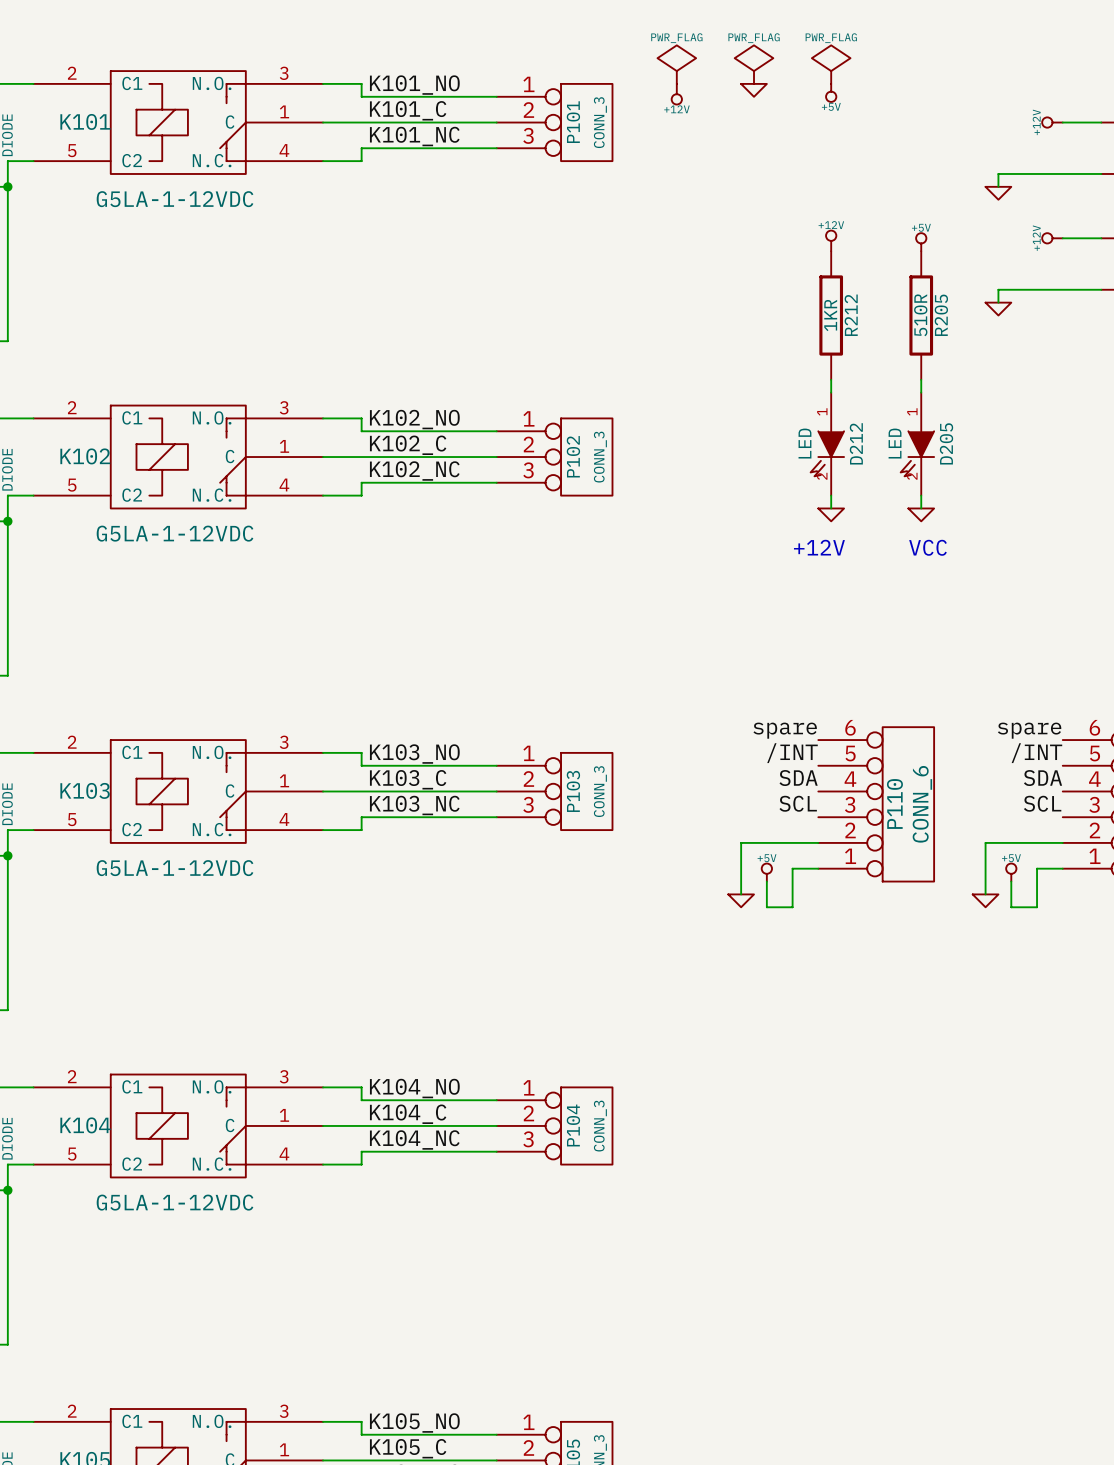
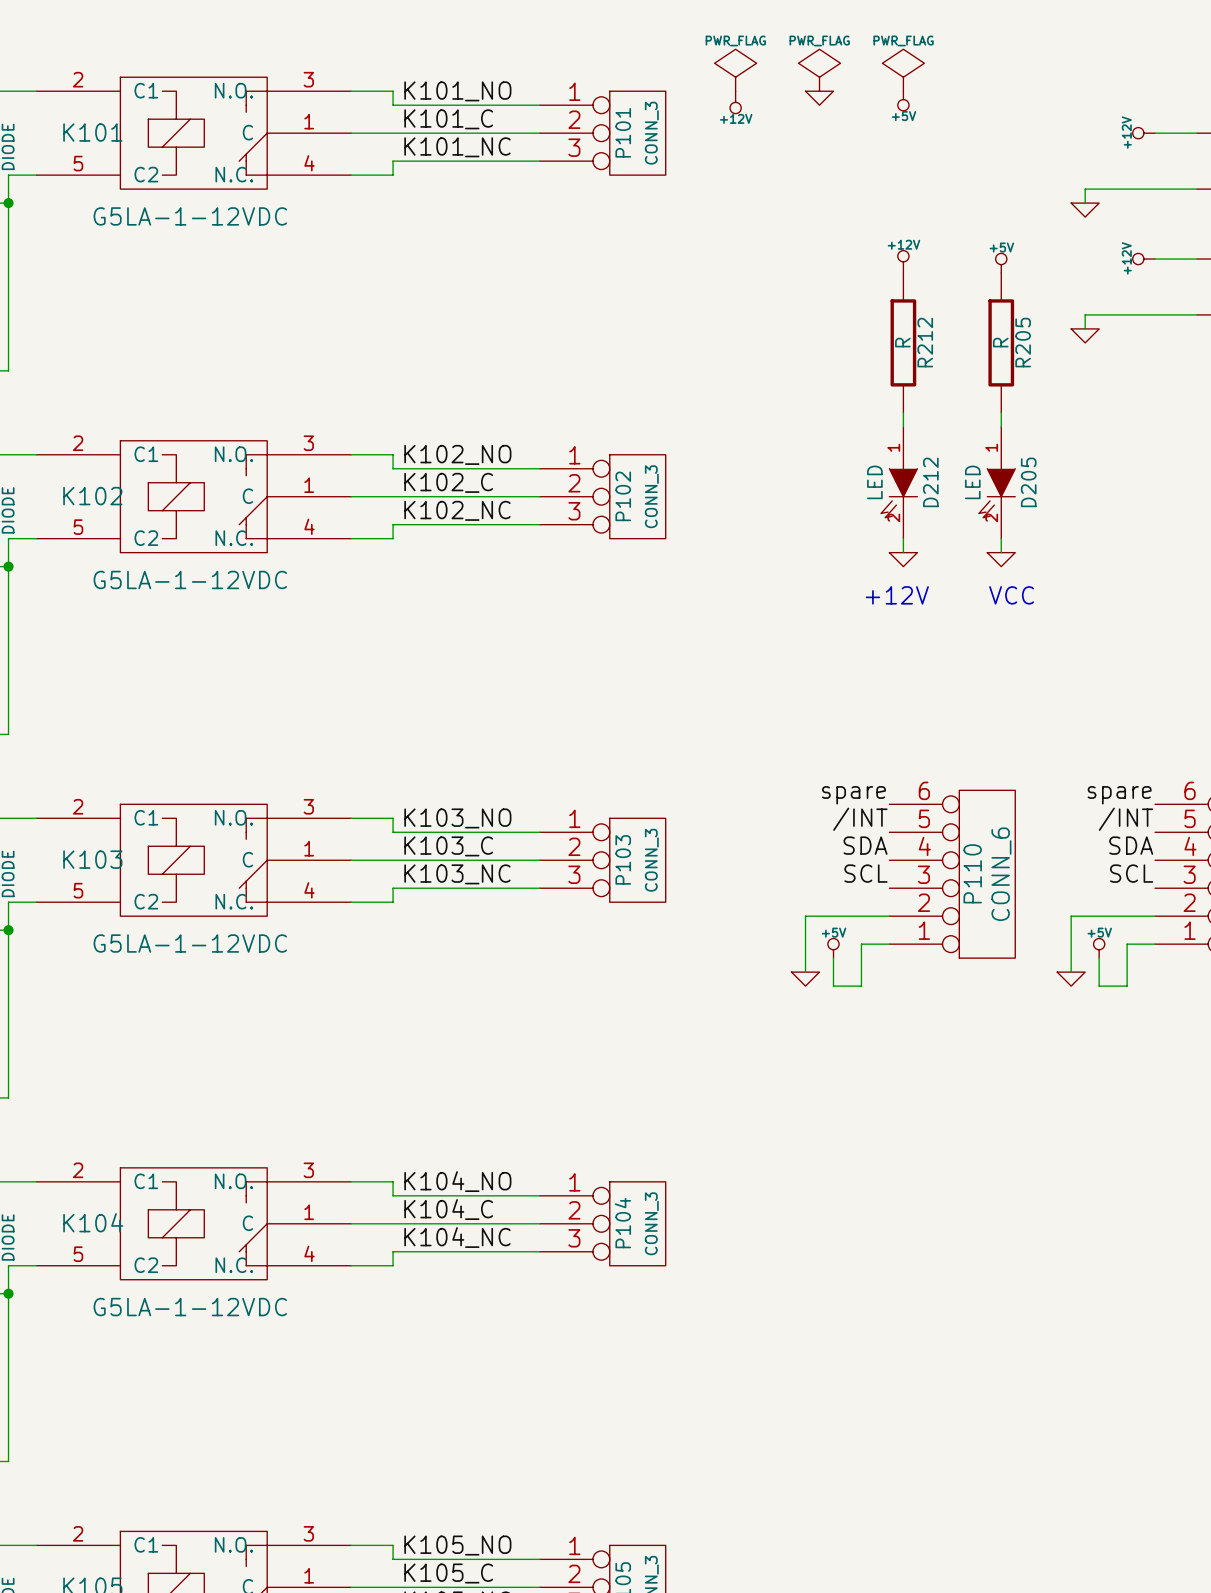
R212 value: 1KR (830, 315) -> R (902, 342)
R205 value: 510R (920, 315) -> R (1000, 342)

